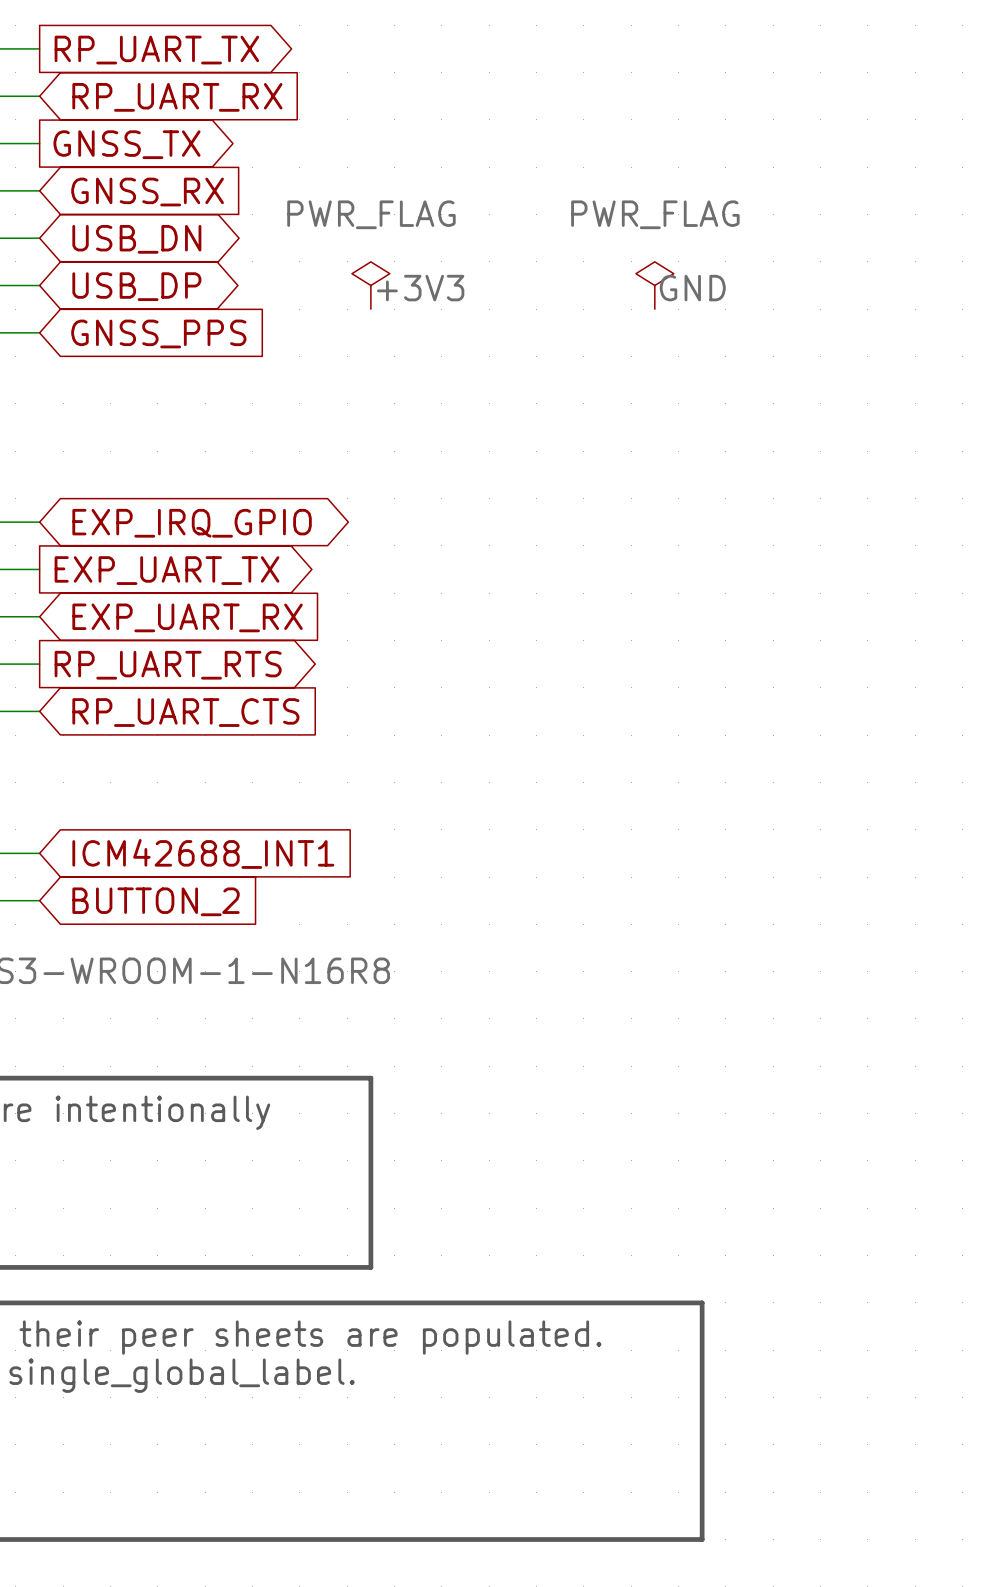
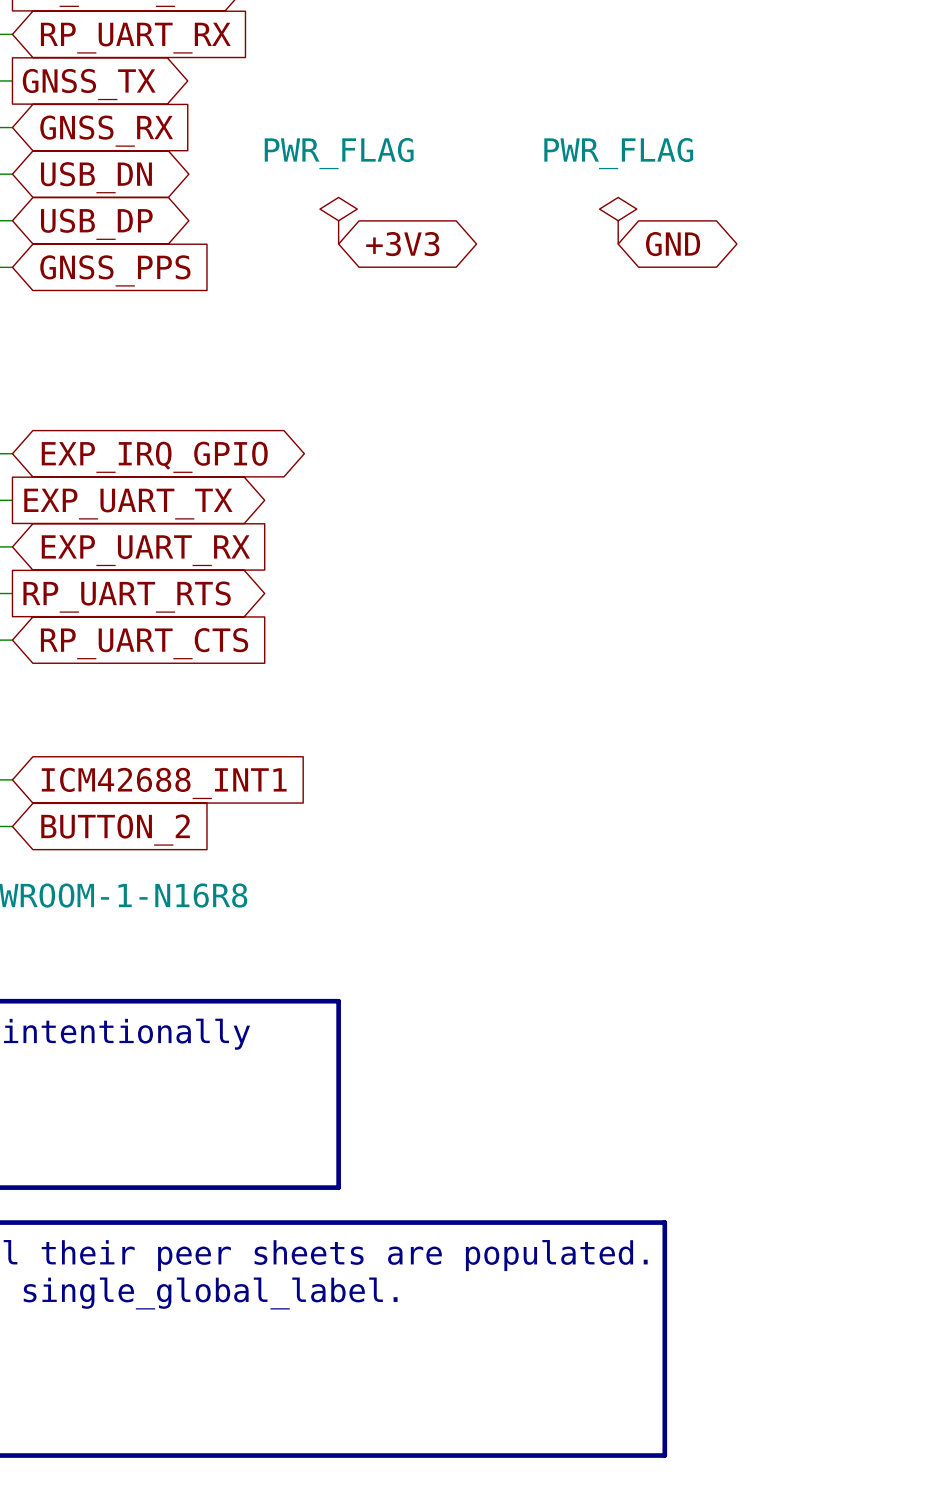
label: +3V3 (420, 288) -> none
label: GND (692, 288) -> none
global label: none -> +3V3 (402, 244)
global label: none -> GND (673, 244)

